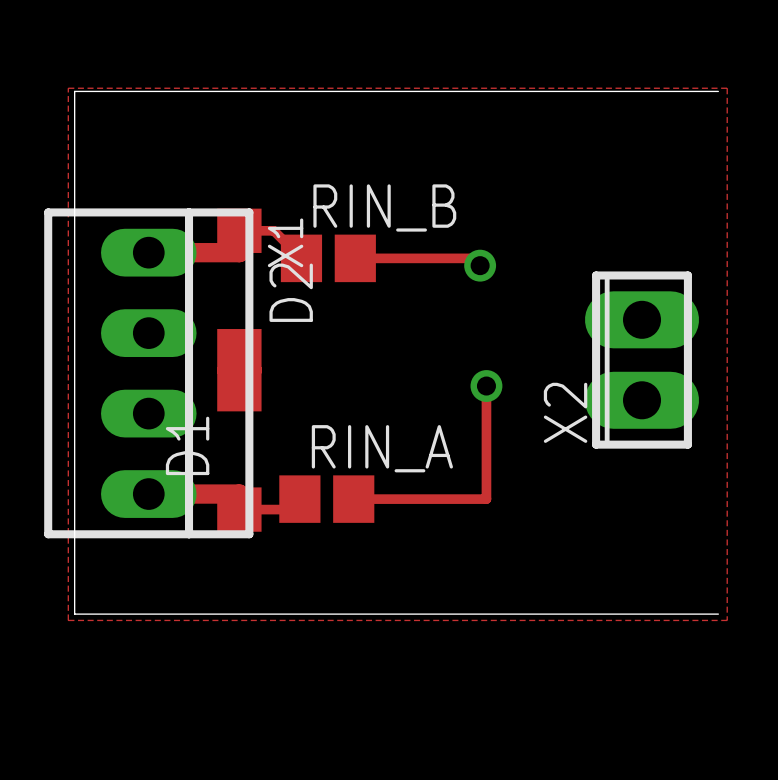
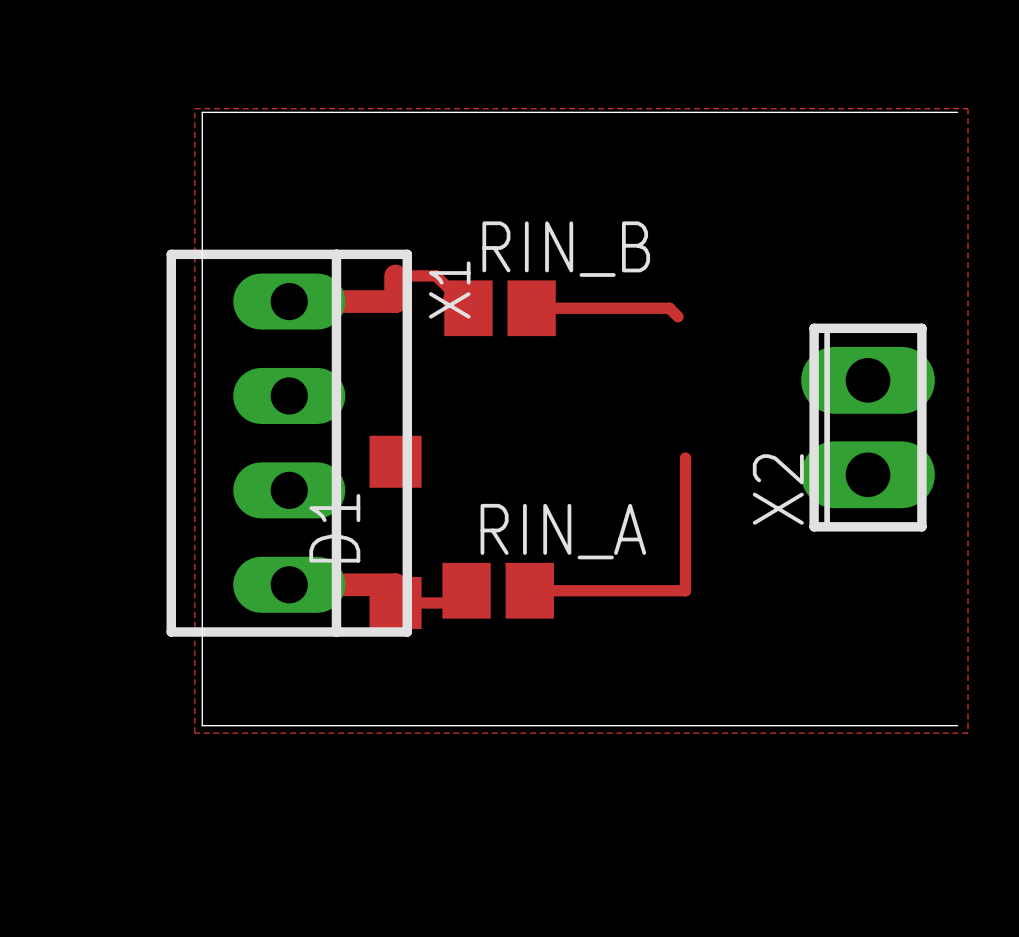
via: (480, 265) -> none
D2: (239, 290) -> none
via: (486, 386) -> none

